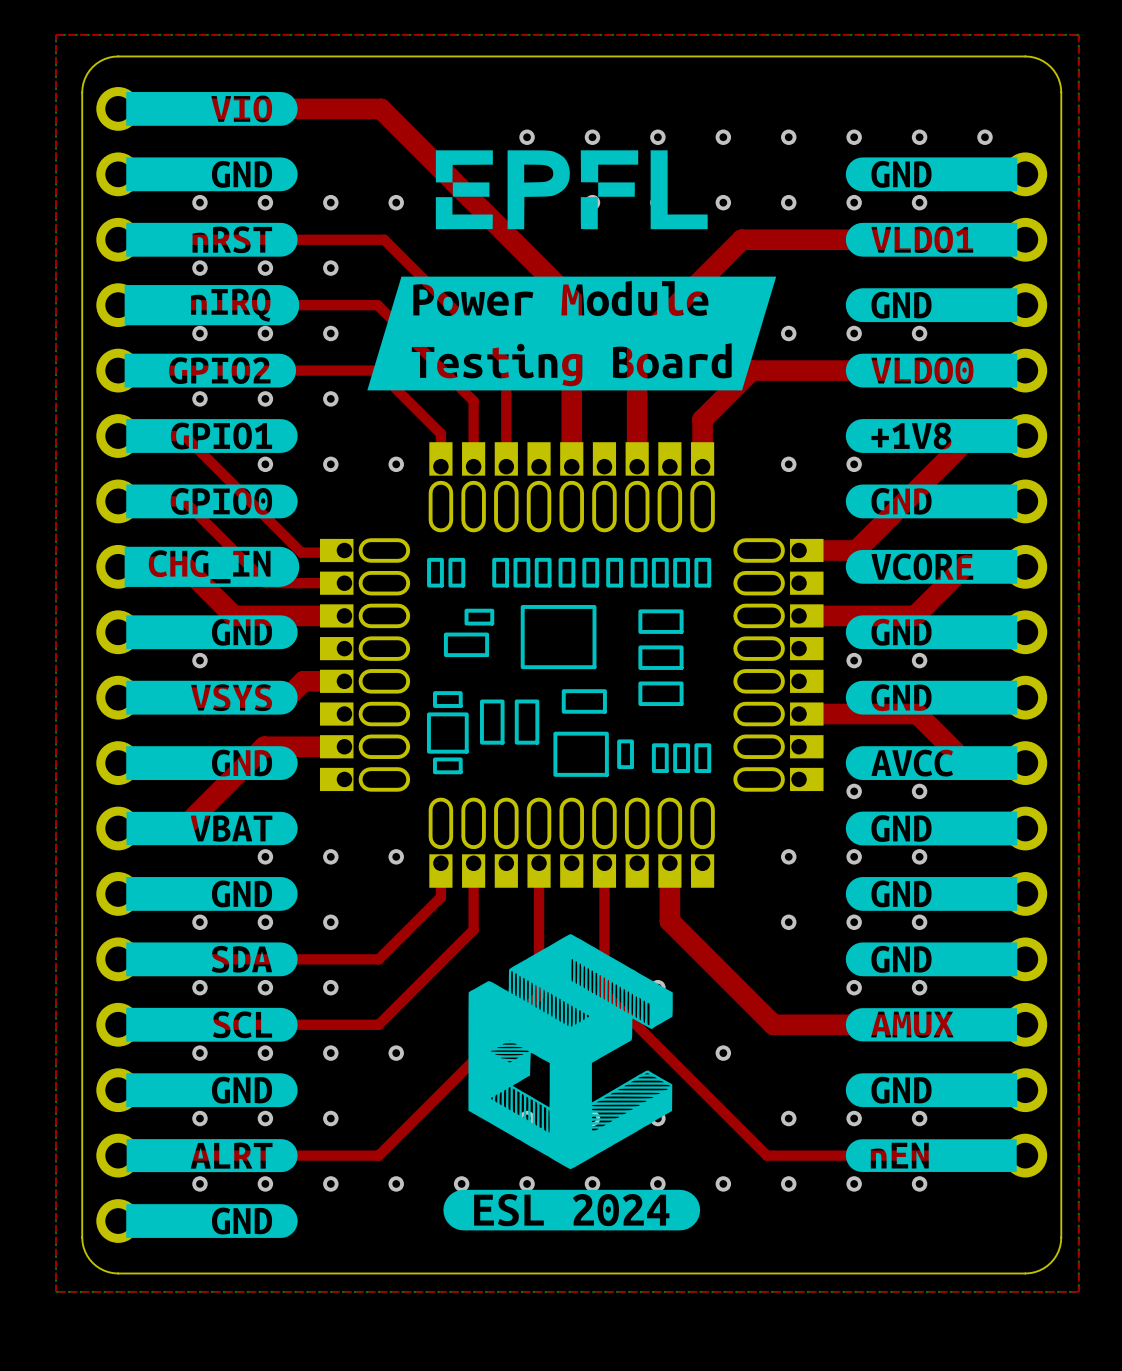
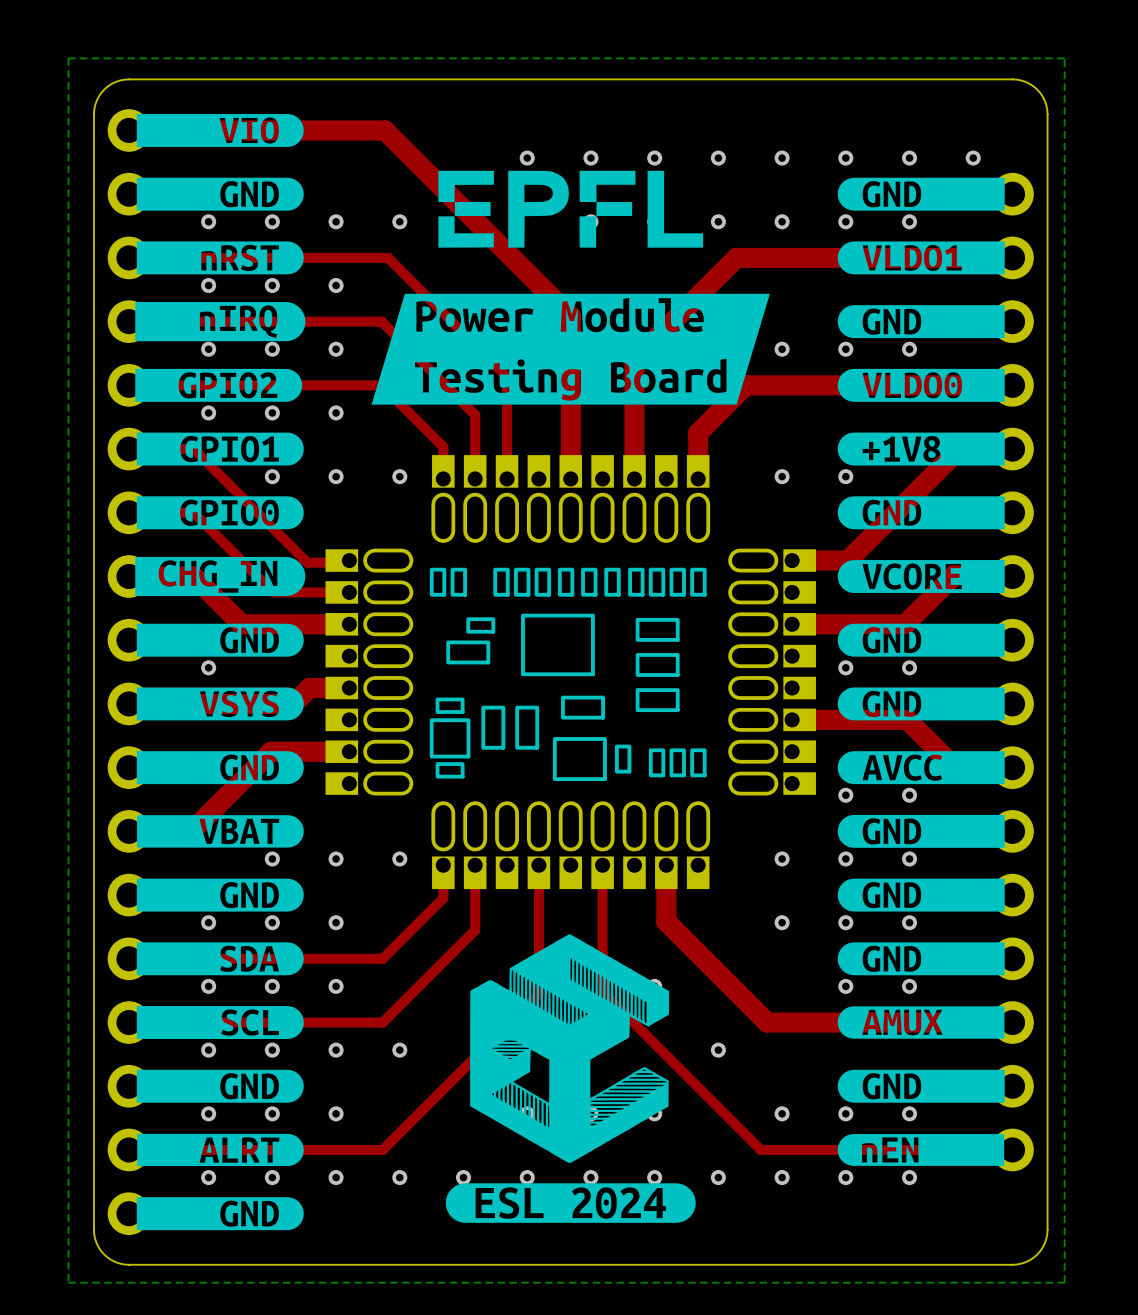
top zone outline: (56, 34) (1078, 34) (1078, 1291) (56, 1291) (56, 34) -> none

